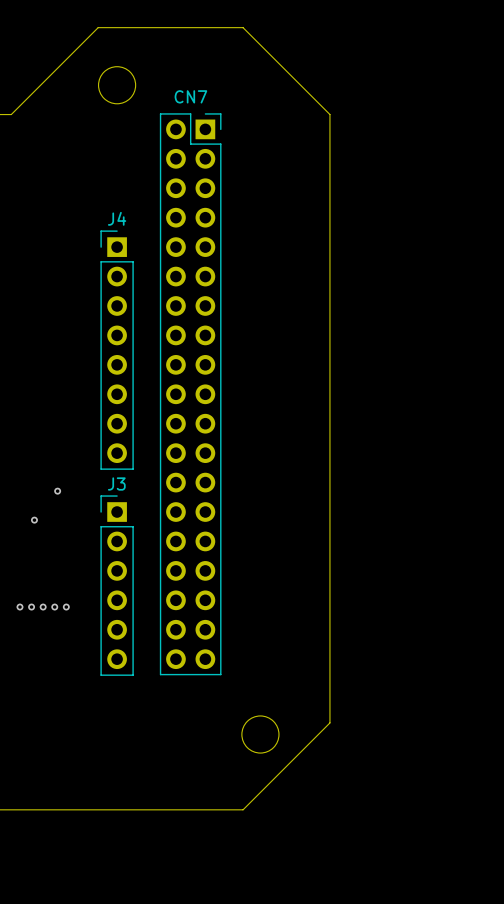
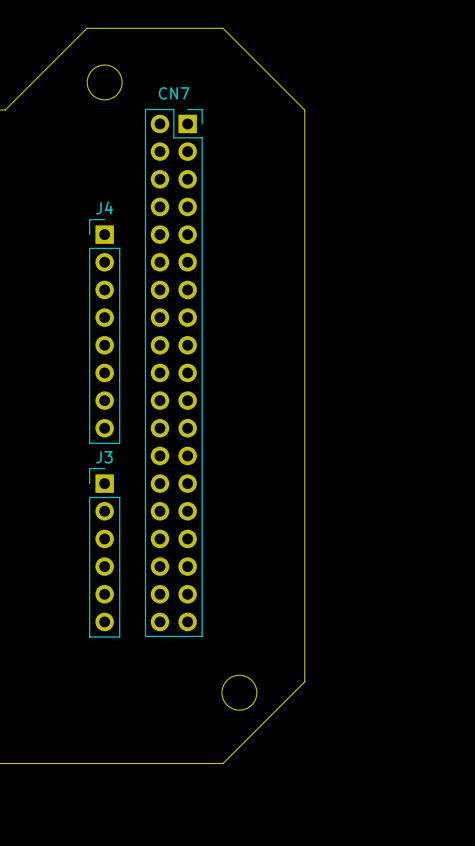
via: (57, 491) -> none
via: (34, 520) -> none
via: (19, 607) -> none
via: (31, 607) -> none
via: (43, 607) -> none
via: (54, 607) -> none
via: (66, 607) -> none

